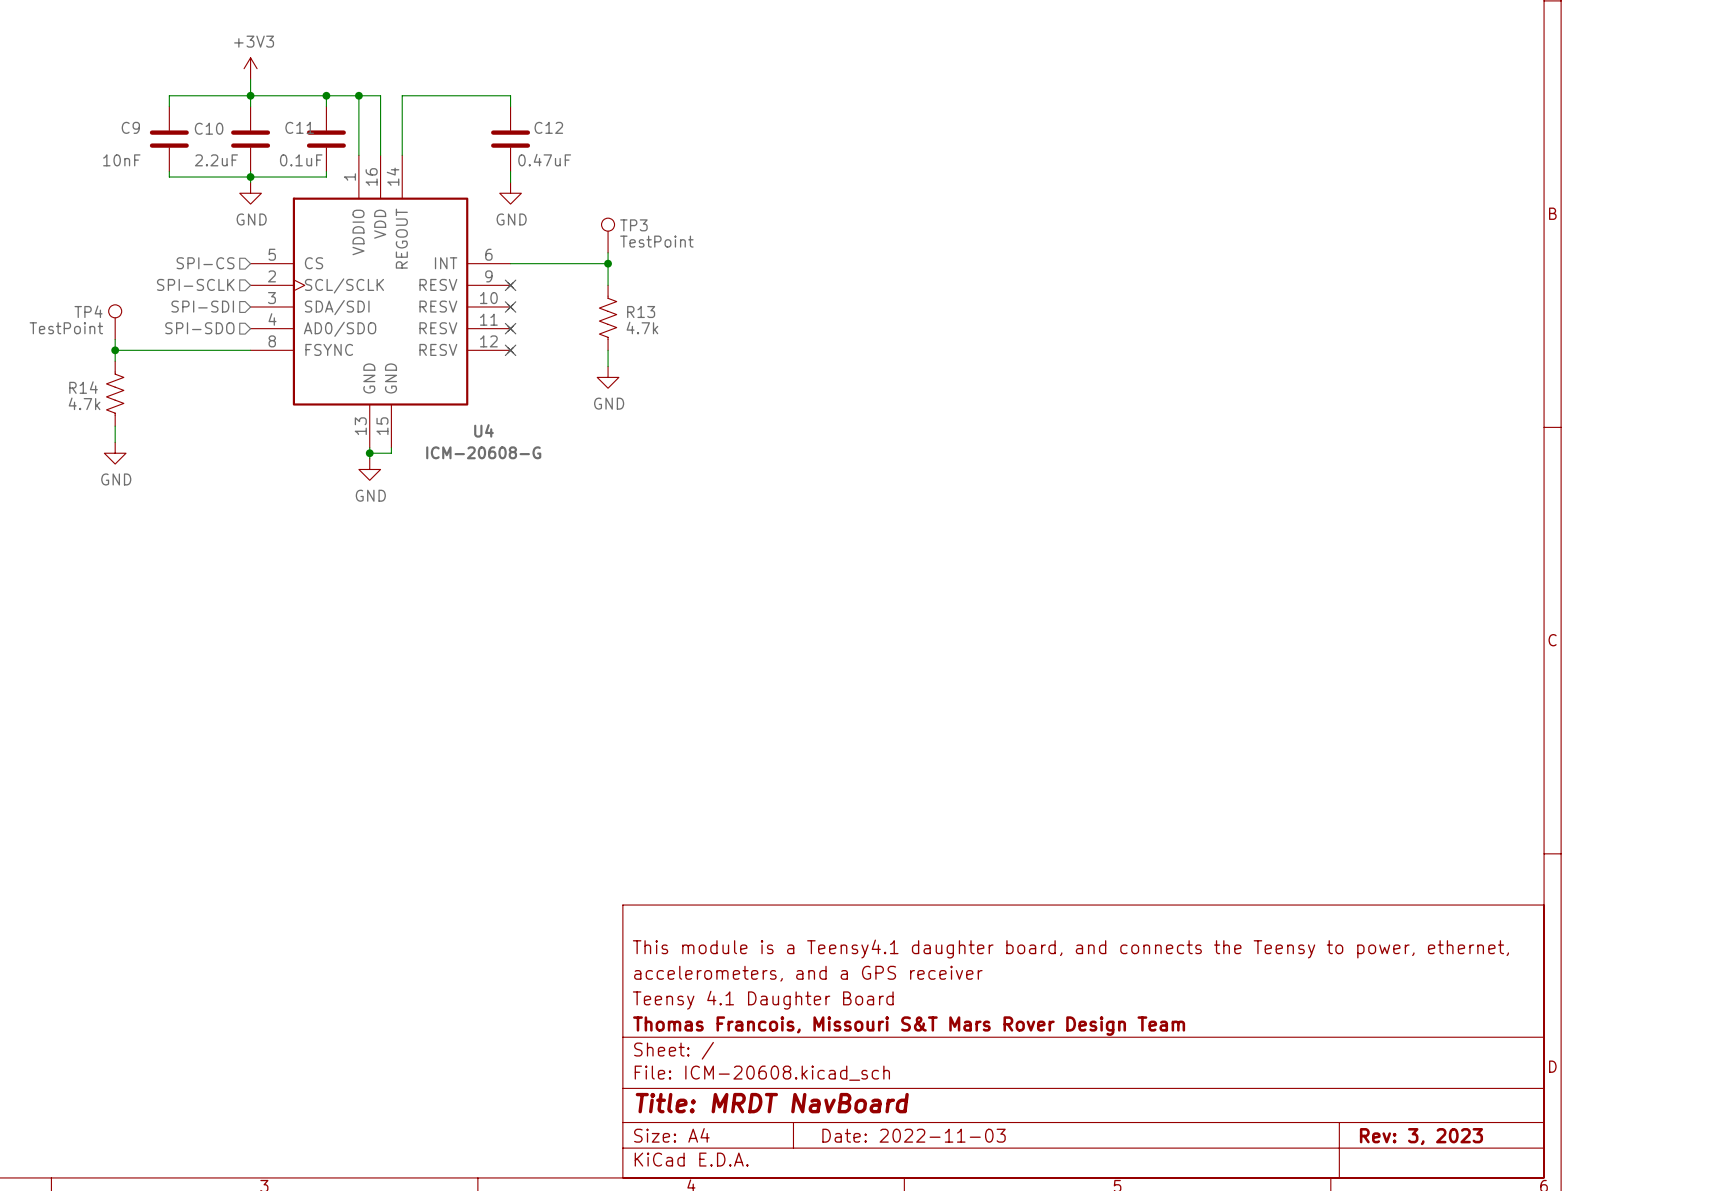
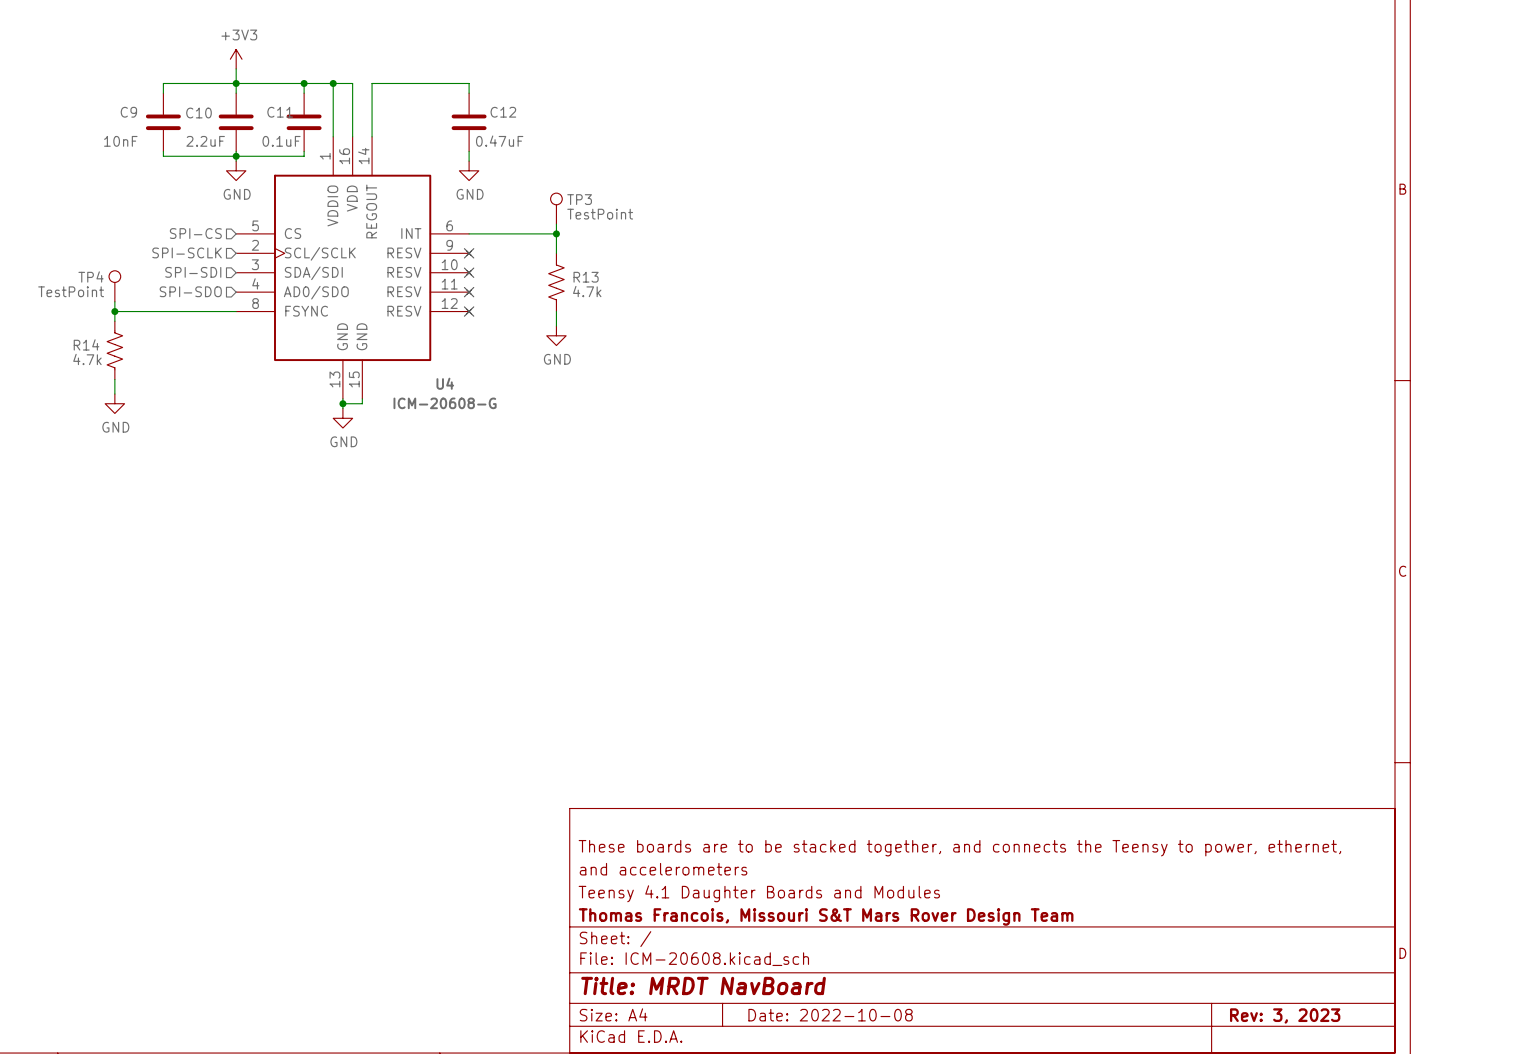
title block: This module is a Teensy4.1 daughter board, and connects the Teensy to power, ethernet, (1070, 949) -> These boards are to be stacked together, and connects the Teensy to power, ethernet, (959, 848)
title block: accelerometers, and a GPS receiver (808, 973) -> and accelerometers (663, 869)
title block: Teensy 4.1 Daughter Board (763, 1000) -> Teensy 4.1 Daughter Boards and Modules (759, 893)
title block: Date: 2022-11-03 (914, 1135) -> Date: 2022-10-08 (830, 1015)

